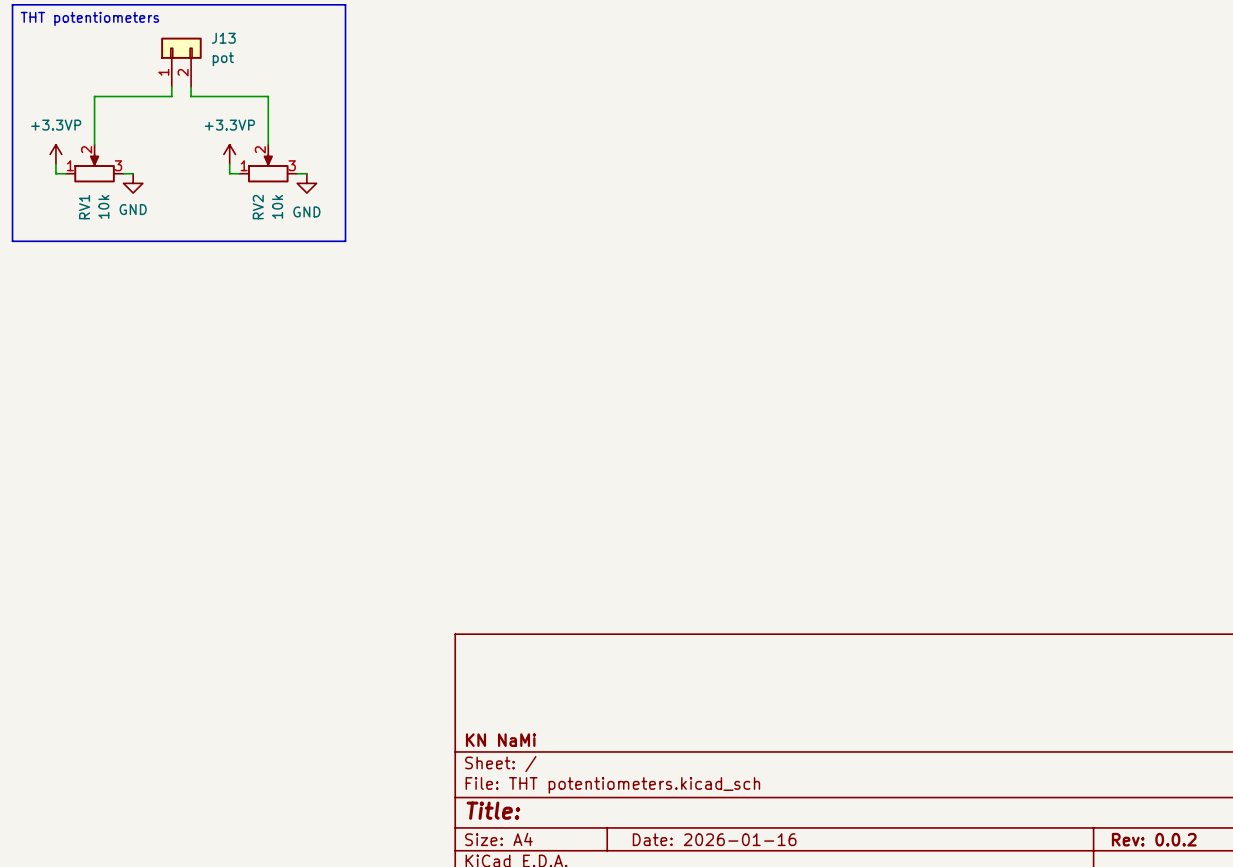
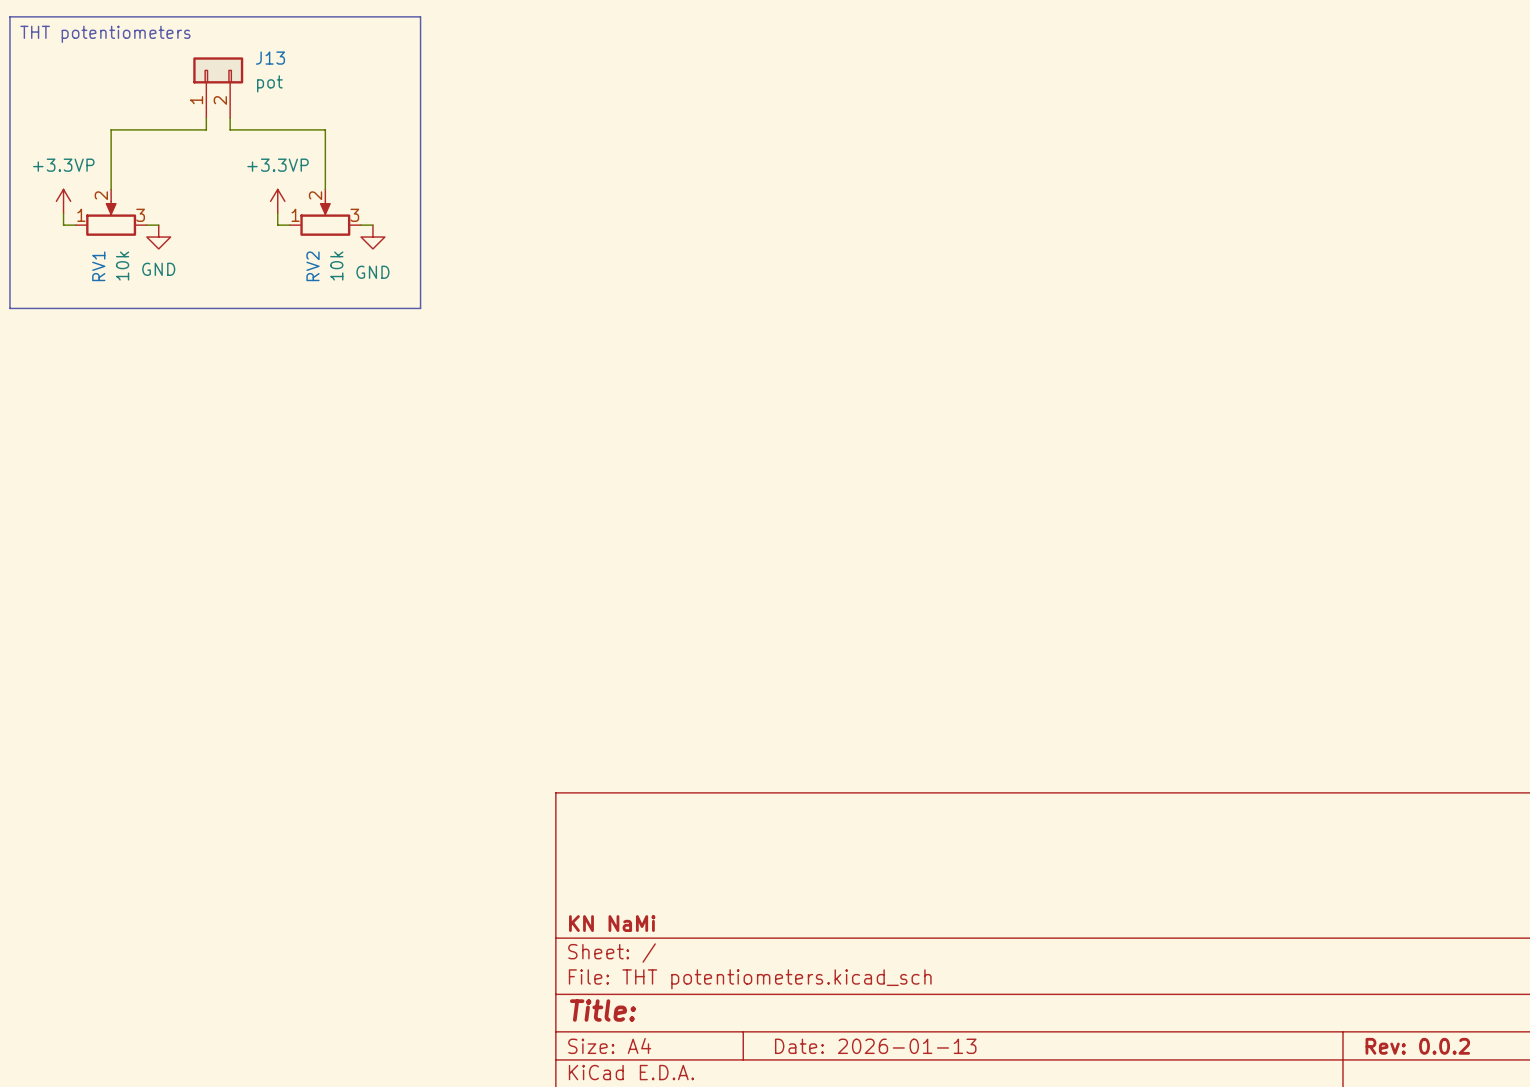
title block: Date: 2026-01-16 (714, 839) -> Date: 2026-01-13 (875, 1046)

